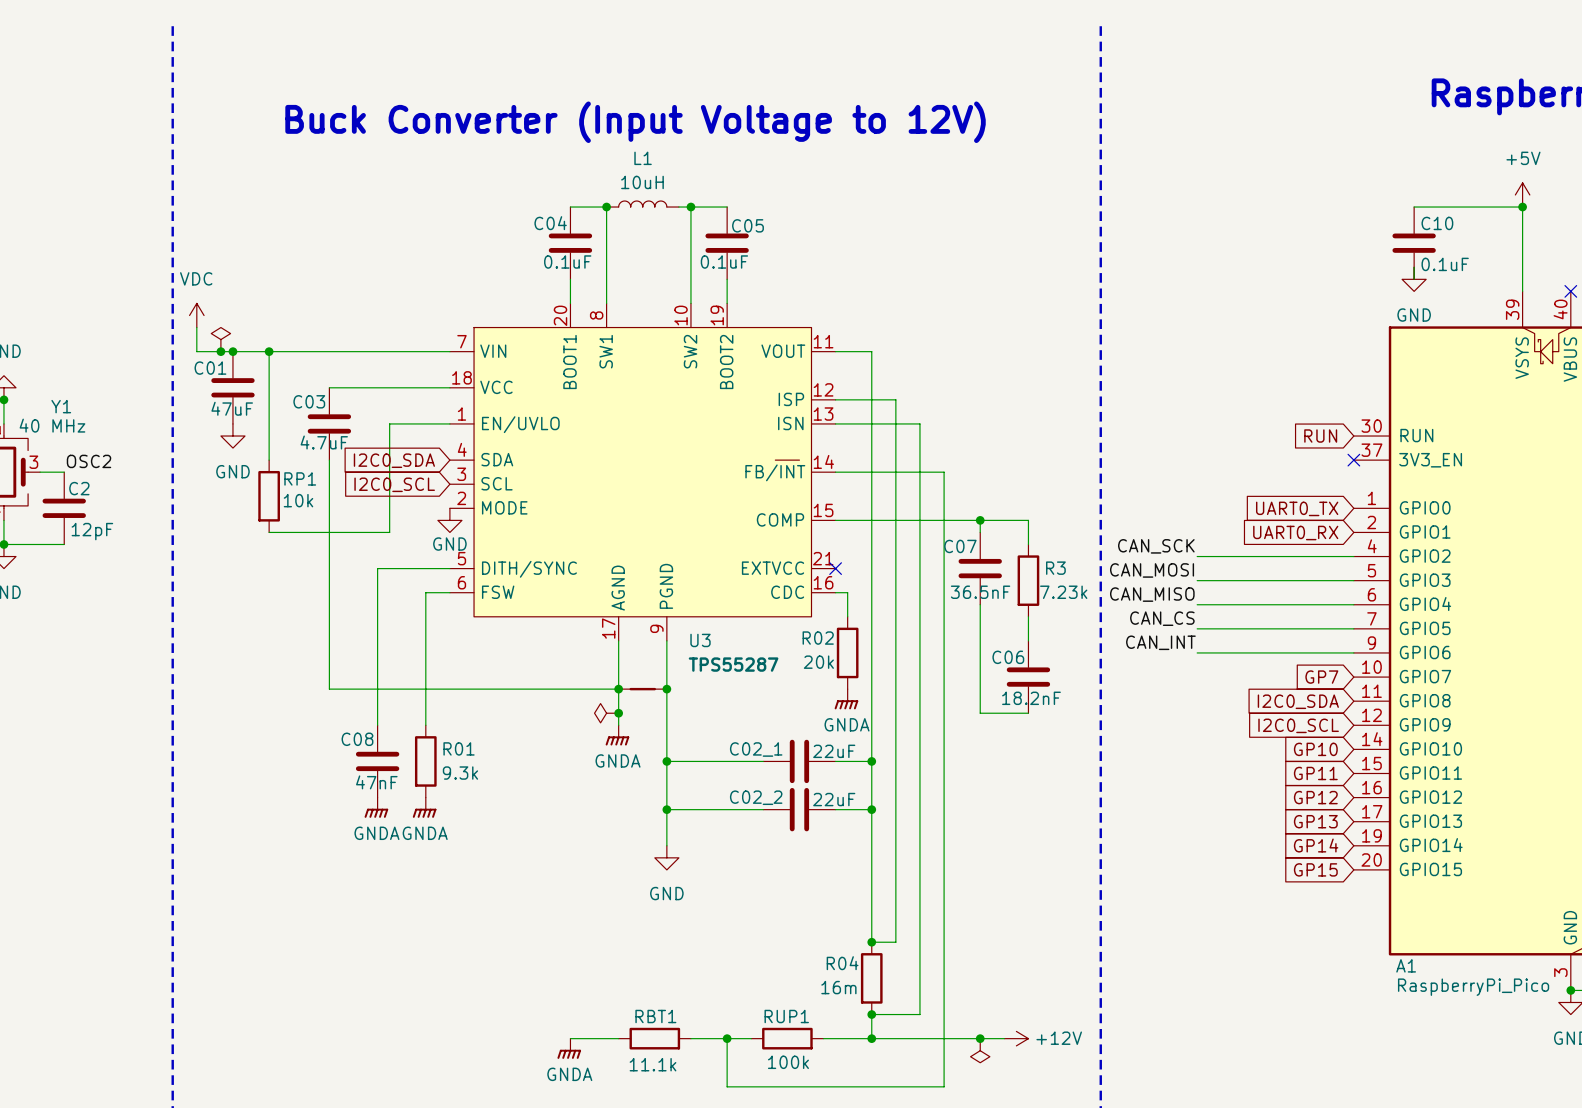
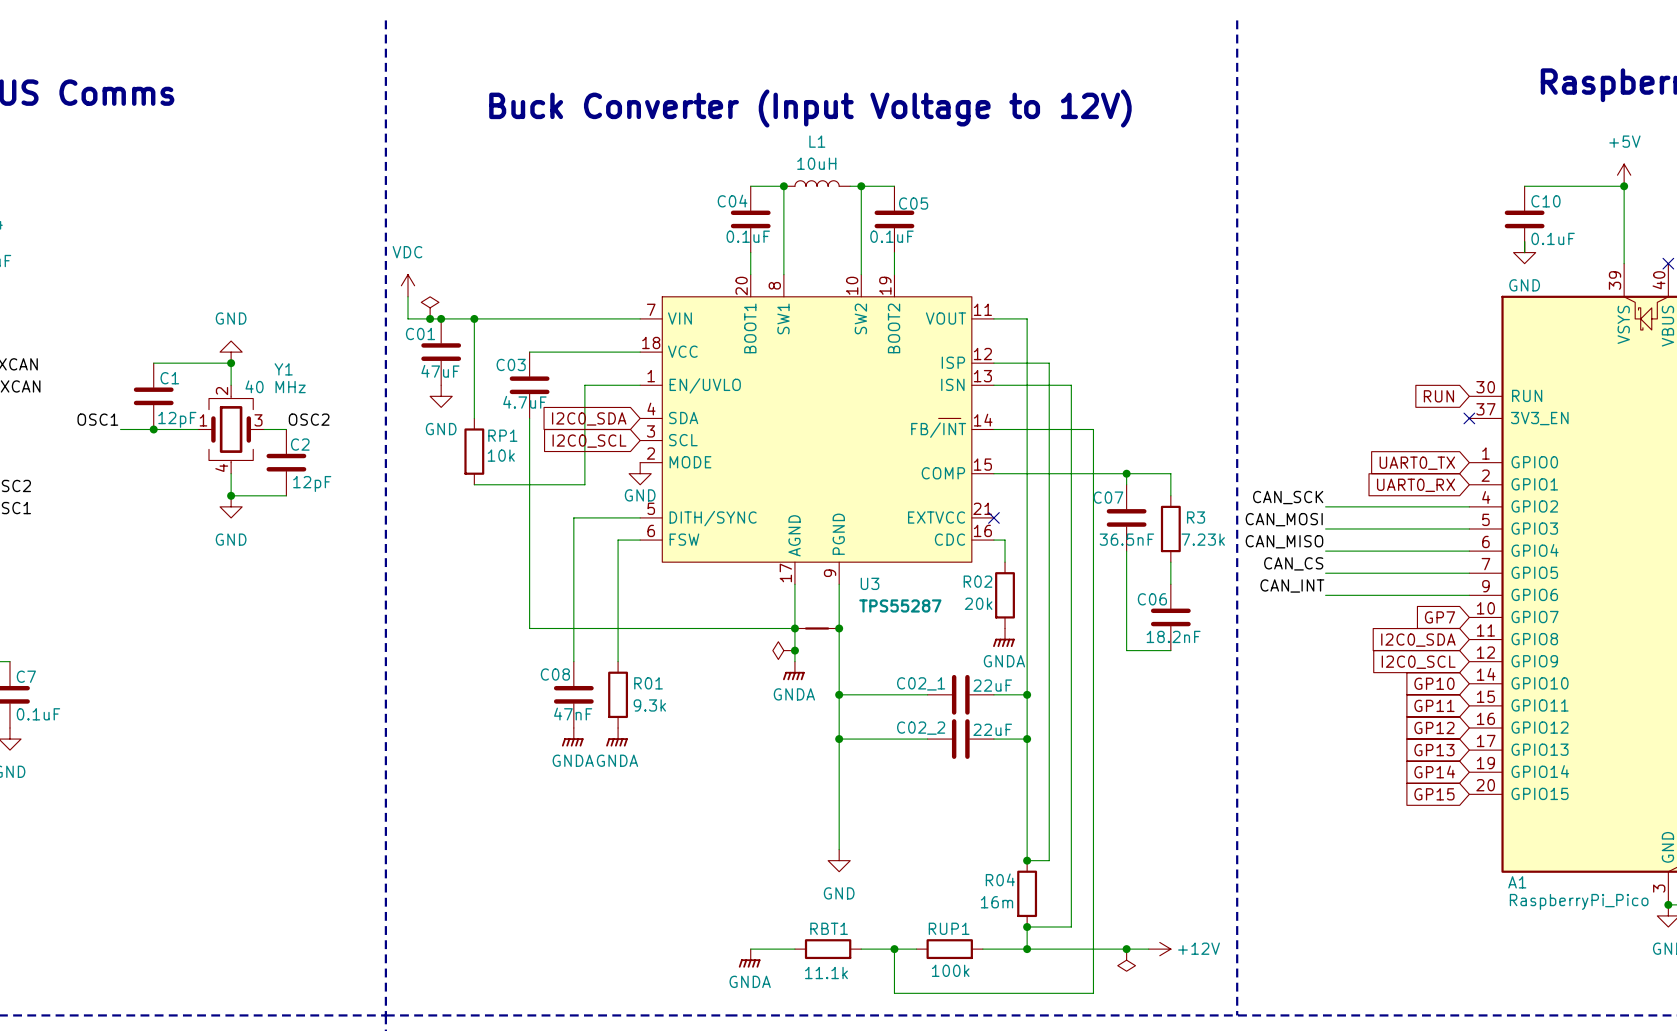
wire: none -> (839, 772) (839, 849)
power symbol position: GND (666, 857) -> GND (839, 860)

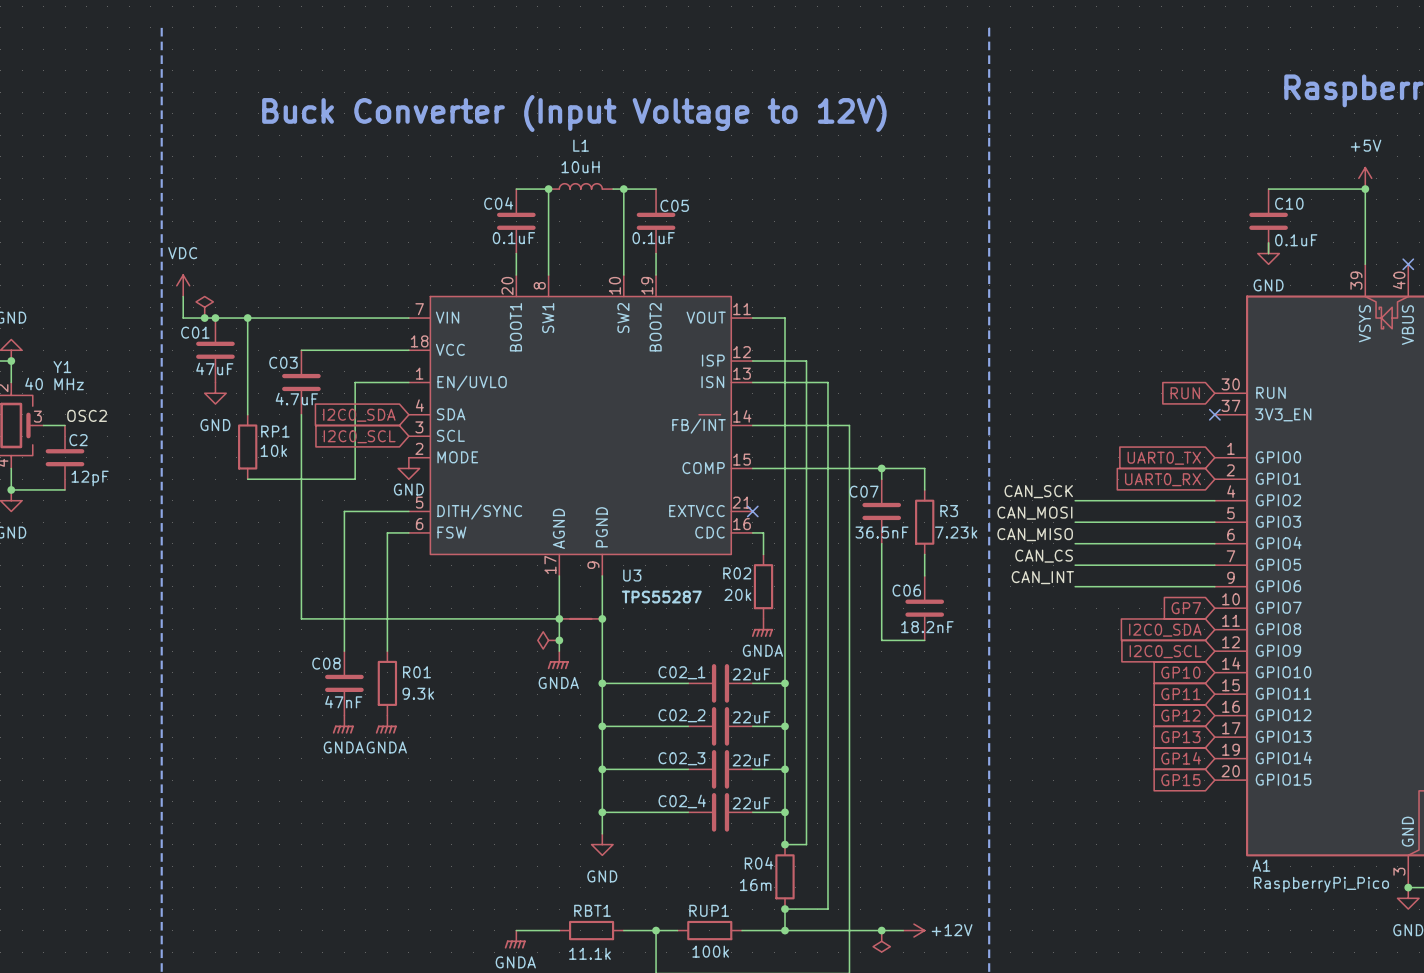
wire: none -> (602, 769) (688, 769)
junction: none -> (602, 769)
C02_3: none -> 22uF (720, 769)
wire: none -> (752, 769) (785, 769)
junction: none -> (785, 769)
wire: none -> (602, 812) (688, 812)
junction: none -> (602, 812)
C02_4: none -> 22uF (720, 812)
wire: none -> (752, 812) (785, 812)
junction: none -> (785, 812)

